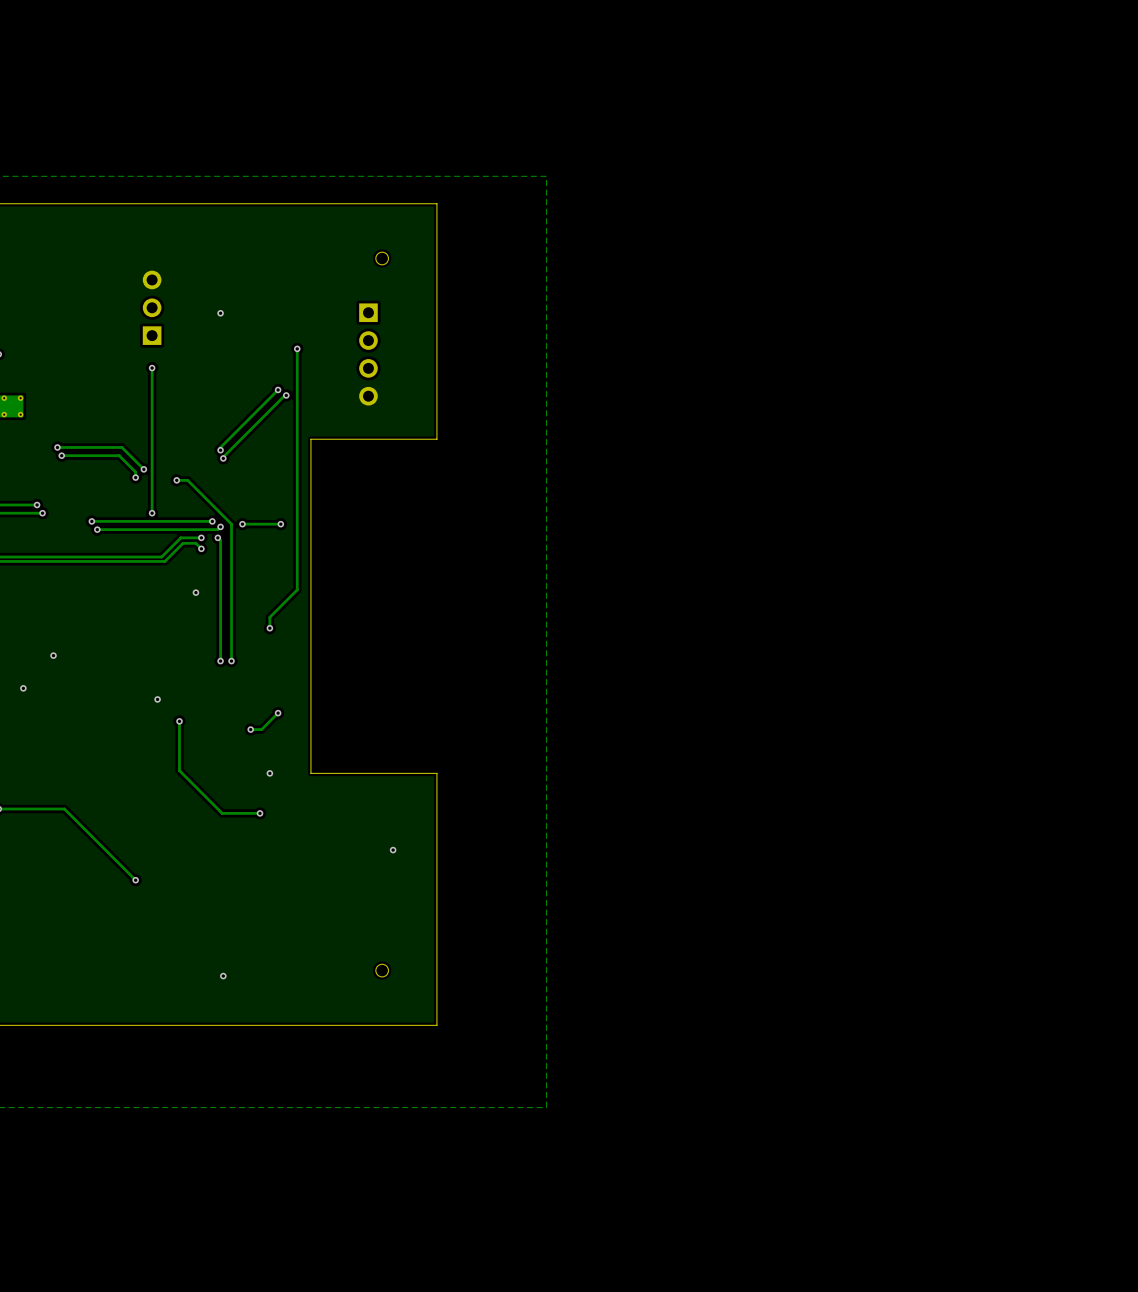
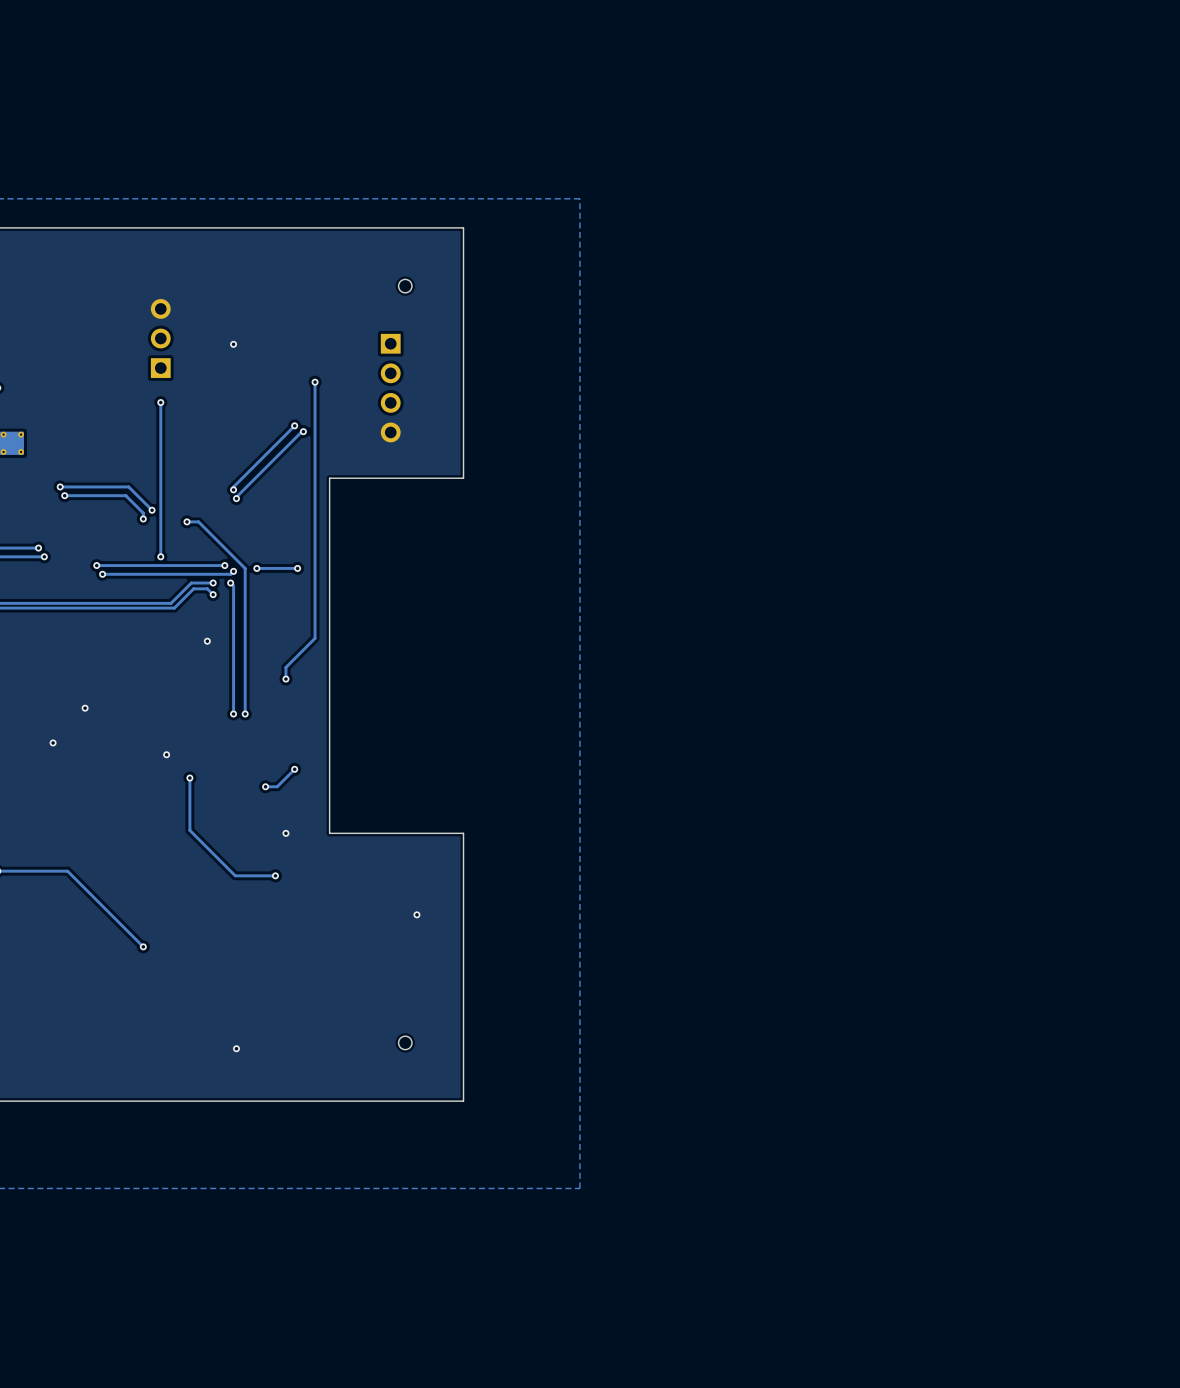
via: (53, 655) -> none
via: none -> (85, 708)
via: (23, 688) -> none
via: none -> (53, 742)

